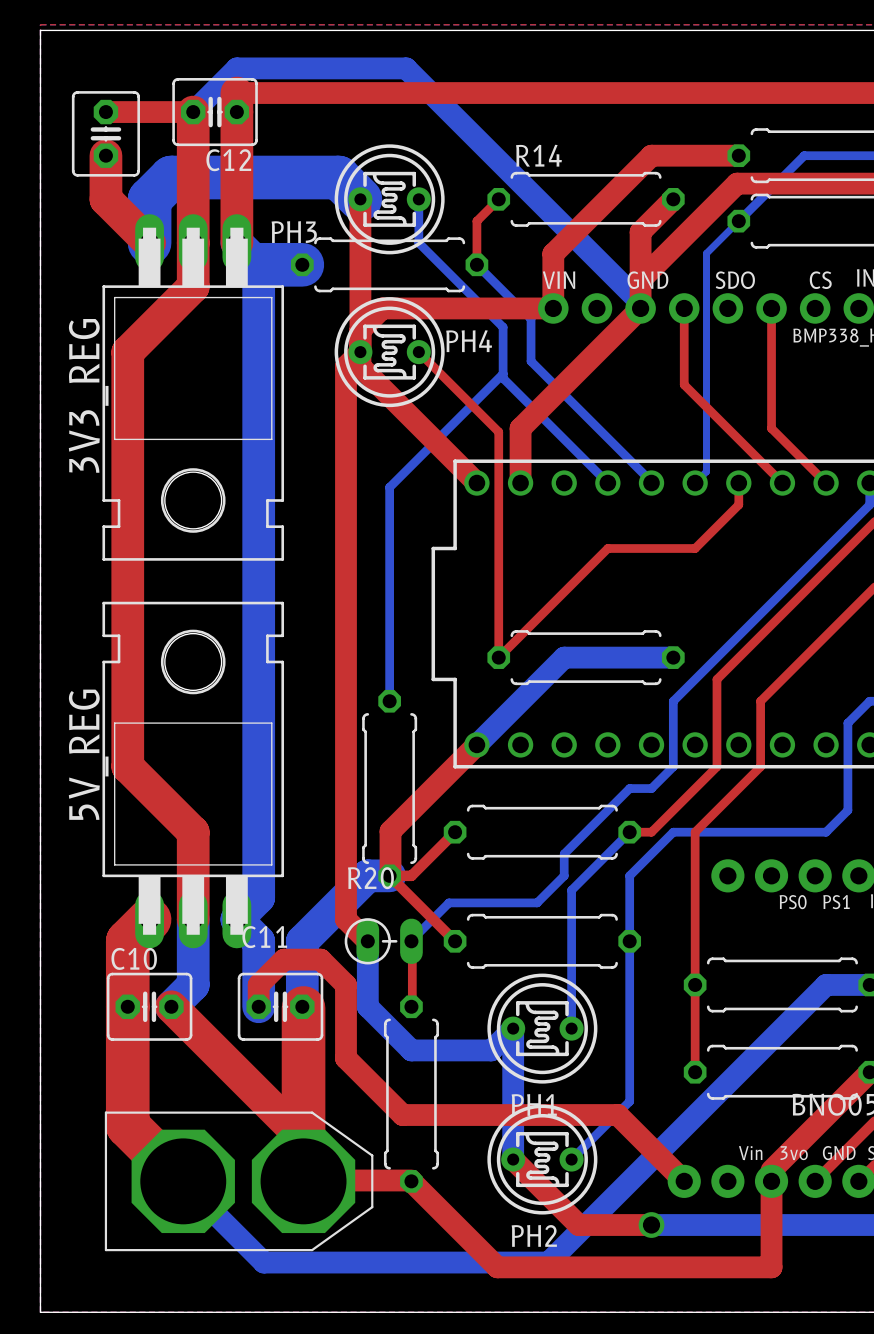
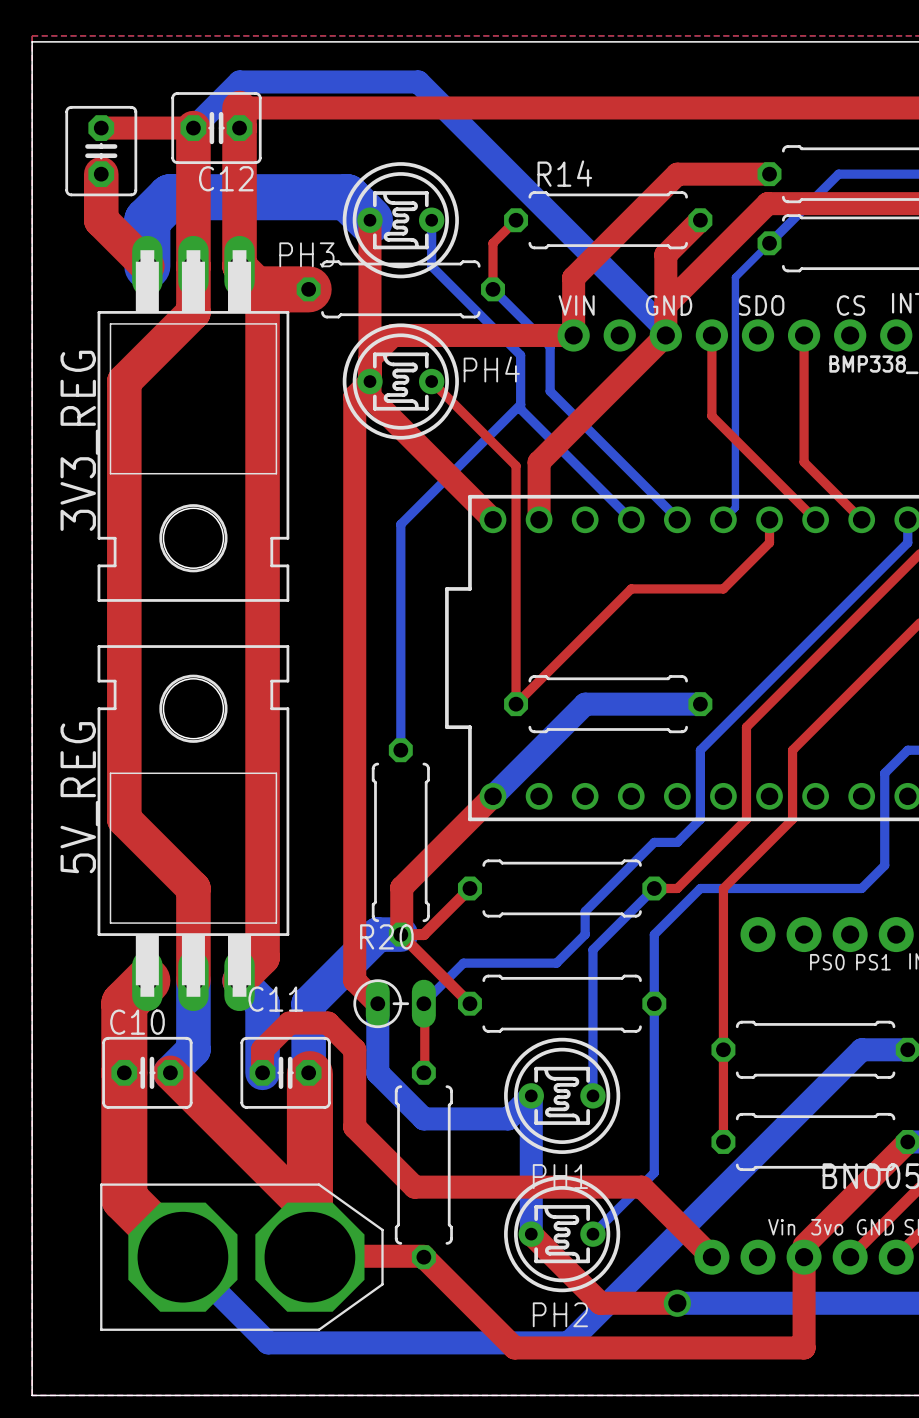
bottom track: (258, 264) (258, 897) (236, 919) -> none
bottom track: (258, 264) (302, 264) -> none
top track: none -> (262, 289) (262, 957) (239, 980)
top track: none -> (262, 289) (308, 289)

